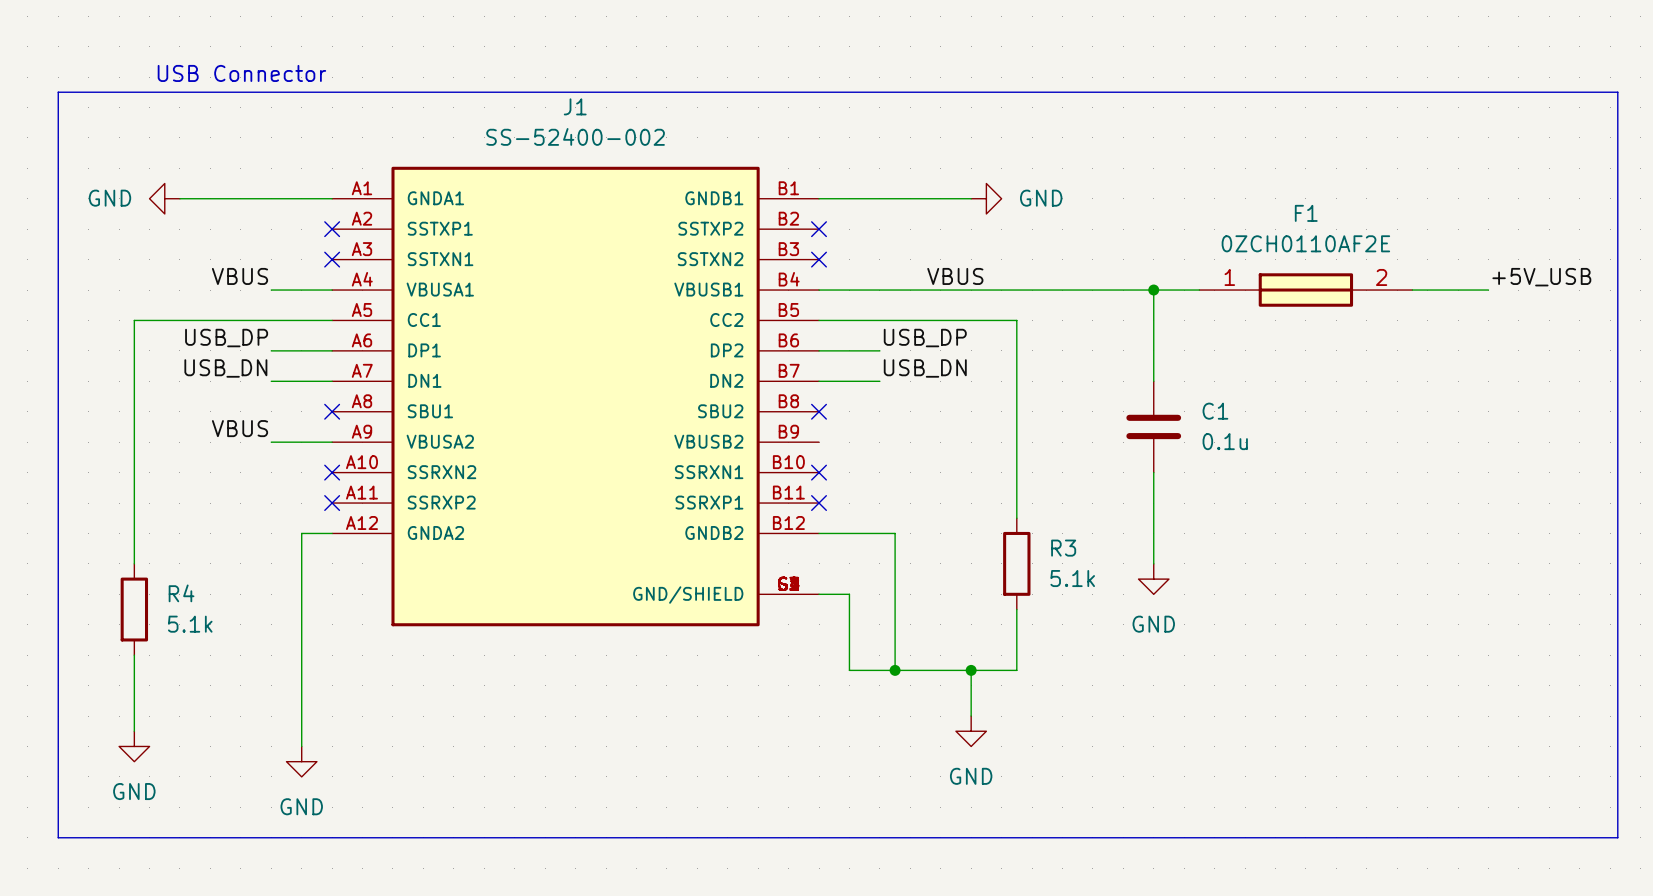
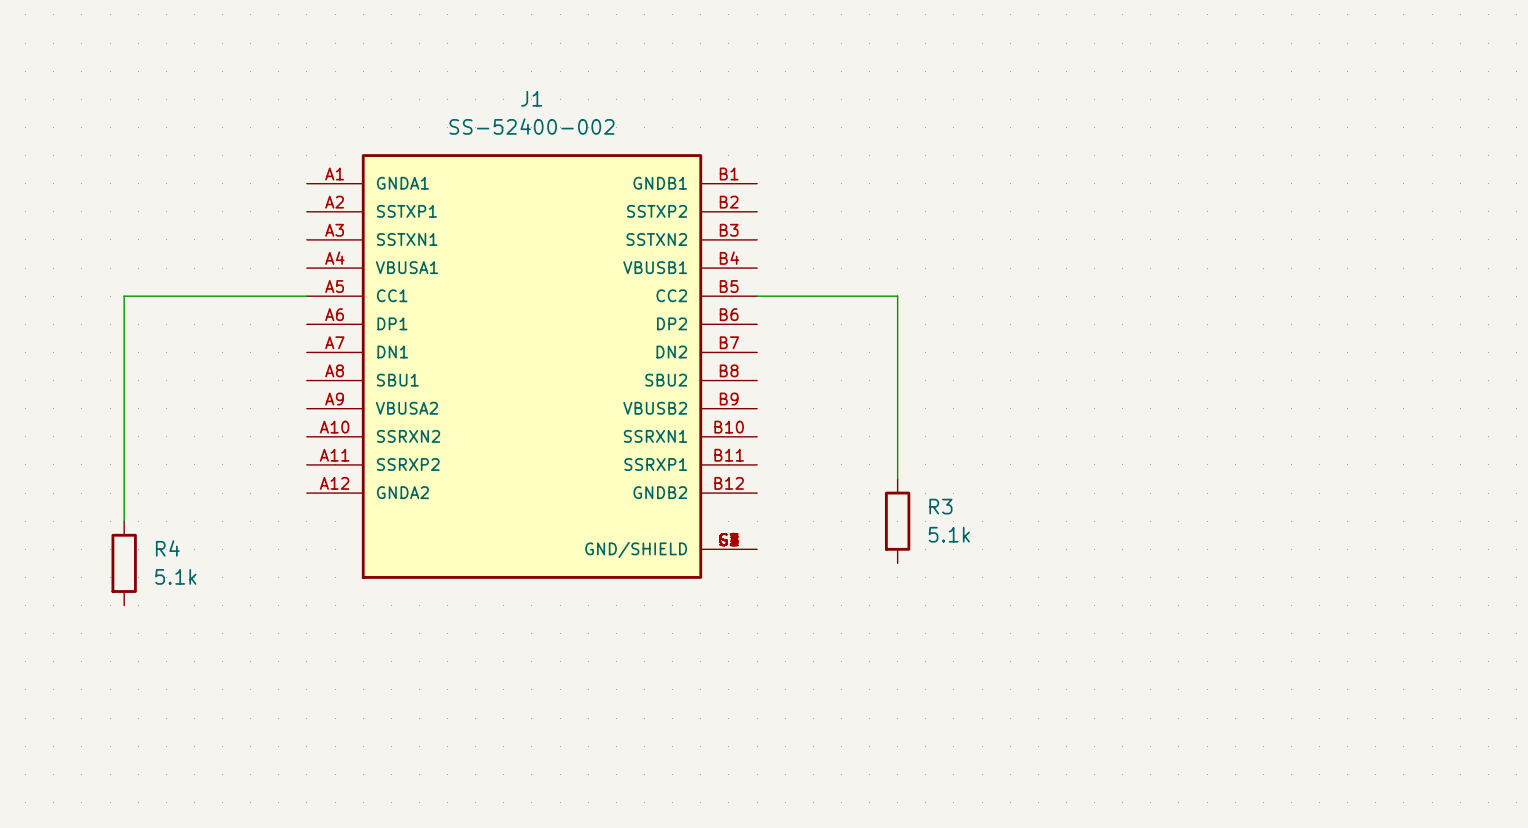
text: USB Connector (241, 73) -> none
line: (58, 92) (1617, 92) (1617, 837) (58, 837) (58, 92) -> none
power symbol: GND (164, 198) -> none
wire: (179, 198) (332, 198) -> none
wire: (819, 198) (971, 198) -> none
power symbol: GND (986, 198) -> none
no-connect mark: (332, 229) -> none
no-connect mark: (819, 229) -> none
no-connect mark: (332, 259) -> none
no-connect mark: (819, 259) -> none
label: VBUS (240, 276) -> none
label: VBUS (955, 276) -> none
label: +5V_USB (1541, 277) -> none
wire: (271, 290) (332, 290) -> none
wire: (819, 290) (1199, 290) -> none
wire: (1153, 290) (1153, 381) -> none
junction: (1153, 290) -> none
F1: 0ZCH0110AF2E (1305, 290) -> none
wire: (1412, 290) (1488, 290) -> none
wire: (971, 320) (1016, 320) (1016, 518) -> (897, 296) (897, 479)
label: USB_DP (226, 338) -> none
label: USB_DP (925, 338) -> none
wire: (271, 350) (332, 350) -> none
wire: (819, 350) (879, 350) -> none
label: USB_DN (225, 368) -> none
label: USB_DN (925, 368) -> none
wire: (271, 381) (332, 381) -> none
wire: (819, 381) (879, 381) -> none
no-connect mark: (332, 411) -> none
no-connect mark: (819, 411) -> none
C1: 0.1u (1153, 426) -> none
label: VBUS (240, 428) -> none
wire: (271, 442) (332, 442) -> none
no-connect mark: (332, 472) -> none
no-connect mark: (819, 472) -> none
wire: (1153, 472) (1153, 563) -> none
no-connect mark: (332, 503) -> none
no-connect mark: (819, 503) -> none
wire: (332, 533) (301, 533) (301, 746) -> none
wire: (819, 533) (895, 533) (895, 670) -> none
R3 position: (1016, 563) -> (897, 521)
power symbol: GND (1153, 579) -> none
wire: (819, 594) (849, 594) (849, 670) (1016, 670) (1016, 609) -> none
wire: (134, 655) (134, 731) -> none
junction: (895, 670) -> none
wire: (971, 670) (971, 716) -> none
junction: (971, 670) -> none
power symbol: GND (971, 731) -> none
power symbol: GND (134, 746) -> none
power symbol: GND (301, 761) -> none

